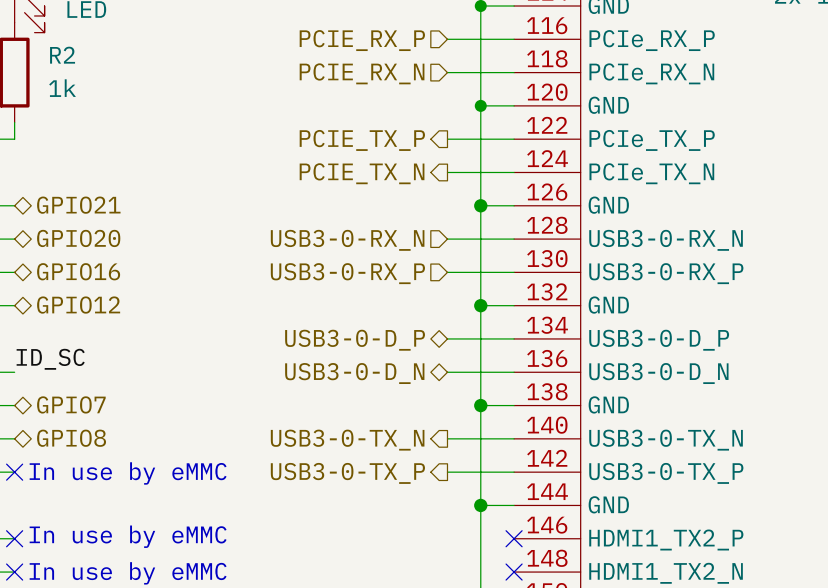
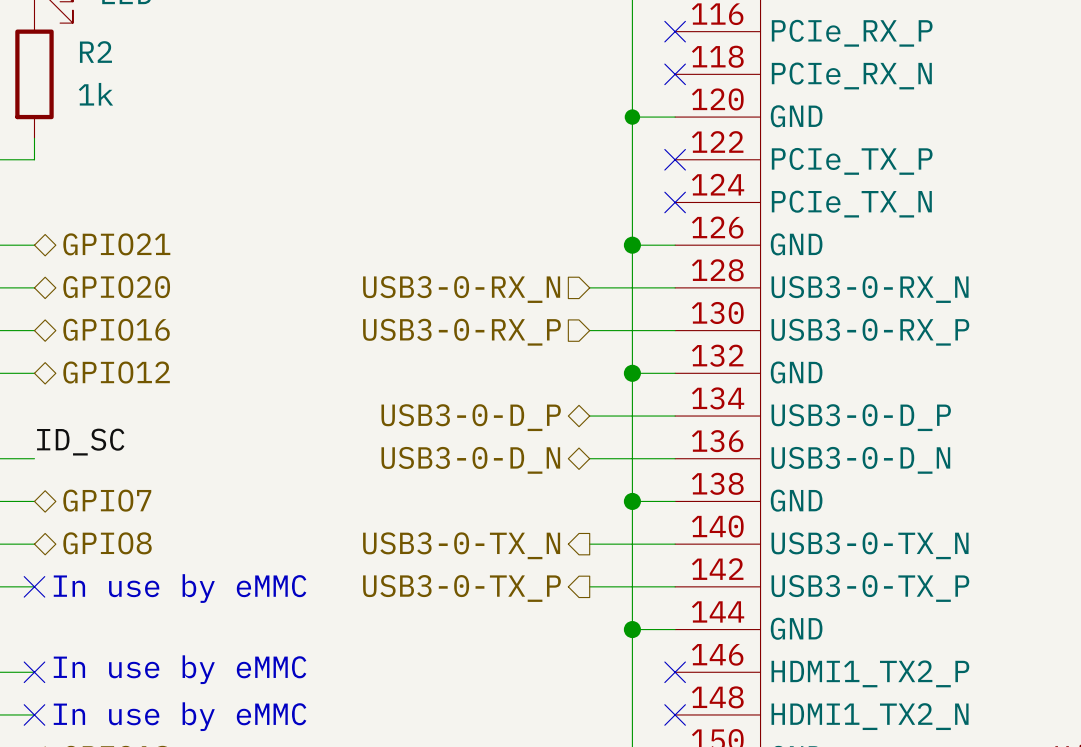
wire: (447, 39) (514, 39) -> none
no-connect mark: none -> (675, 31)
hierarchical label: PCIE_RX_P (362, 40) -> none
wire: (447, 72) (514, 72) -> none
no-connect mark: none -> (675, 74)
hierarchical label: PCIE_RX_N (362, 73) -> none
wire: (447, 139) (514, 139) -> none
no-connect mark: none -> (675, 159)
hierarchical label: PCIE_TX_P (362, 140) -> none
wire: (447, 172) (514, 172) -> none
no-connect mark: none -> (675, 202)
hierarchical label: PCIE_TX_N (362, 173) -> none

